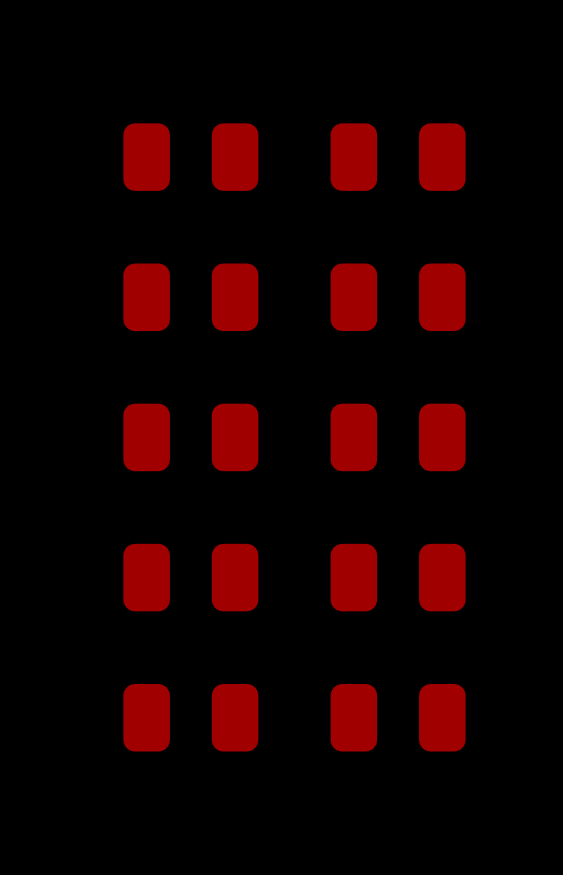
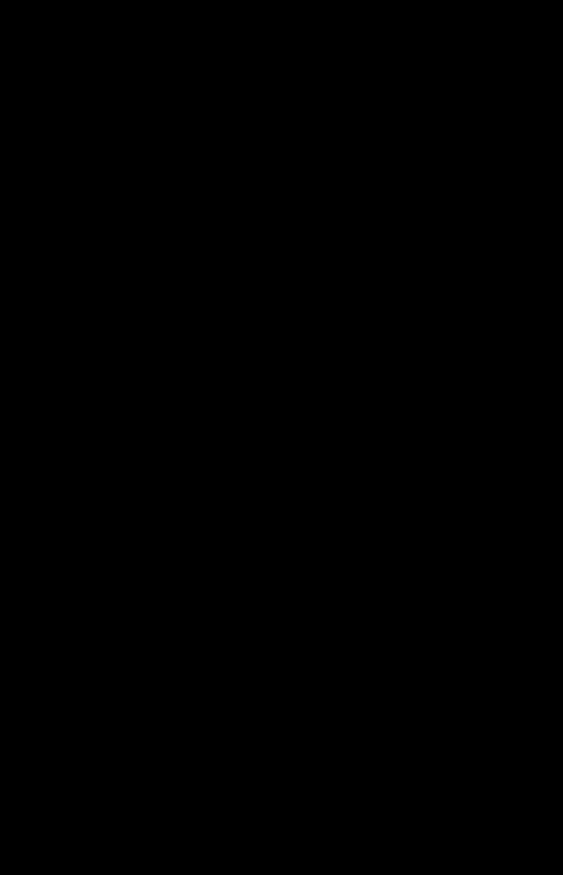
part: (190, 157) -> none
part: (398, 157) -> none
part: (190, 297) -> none
part: (398, 297) -> none
part: (190, 437) -> none
part: (398, 437) -> none
part: (190, 577) -> none
part: (398, 577) -> none
part: (190, 717) -> none
part: (398, 717) -> none

